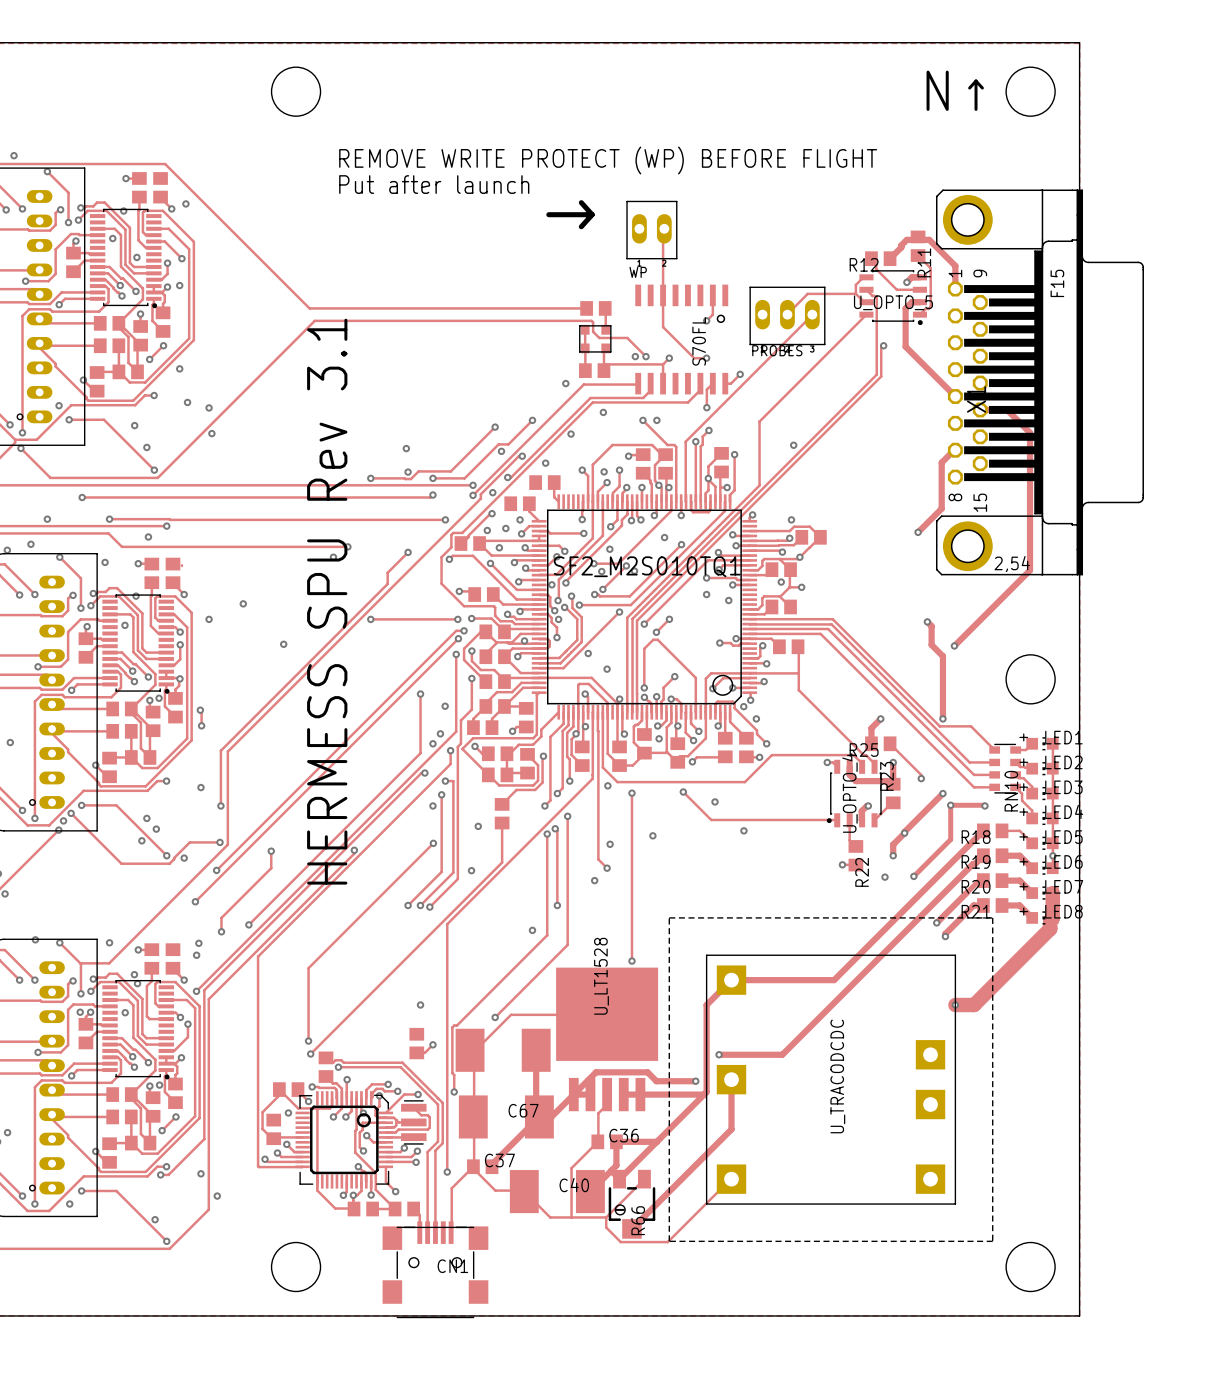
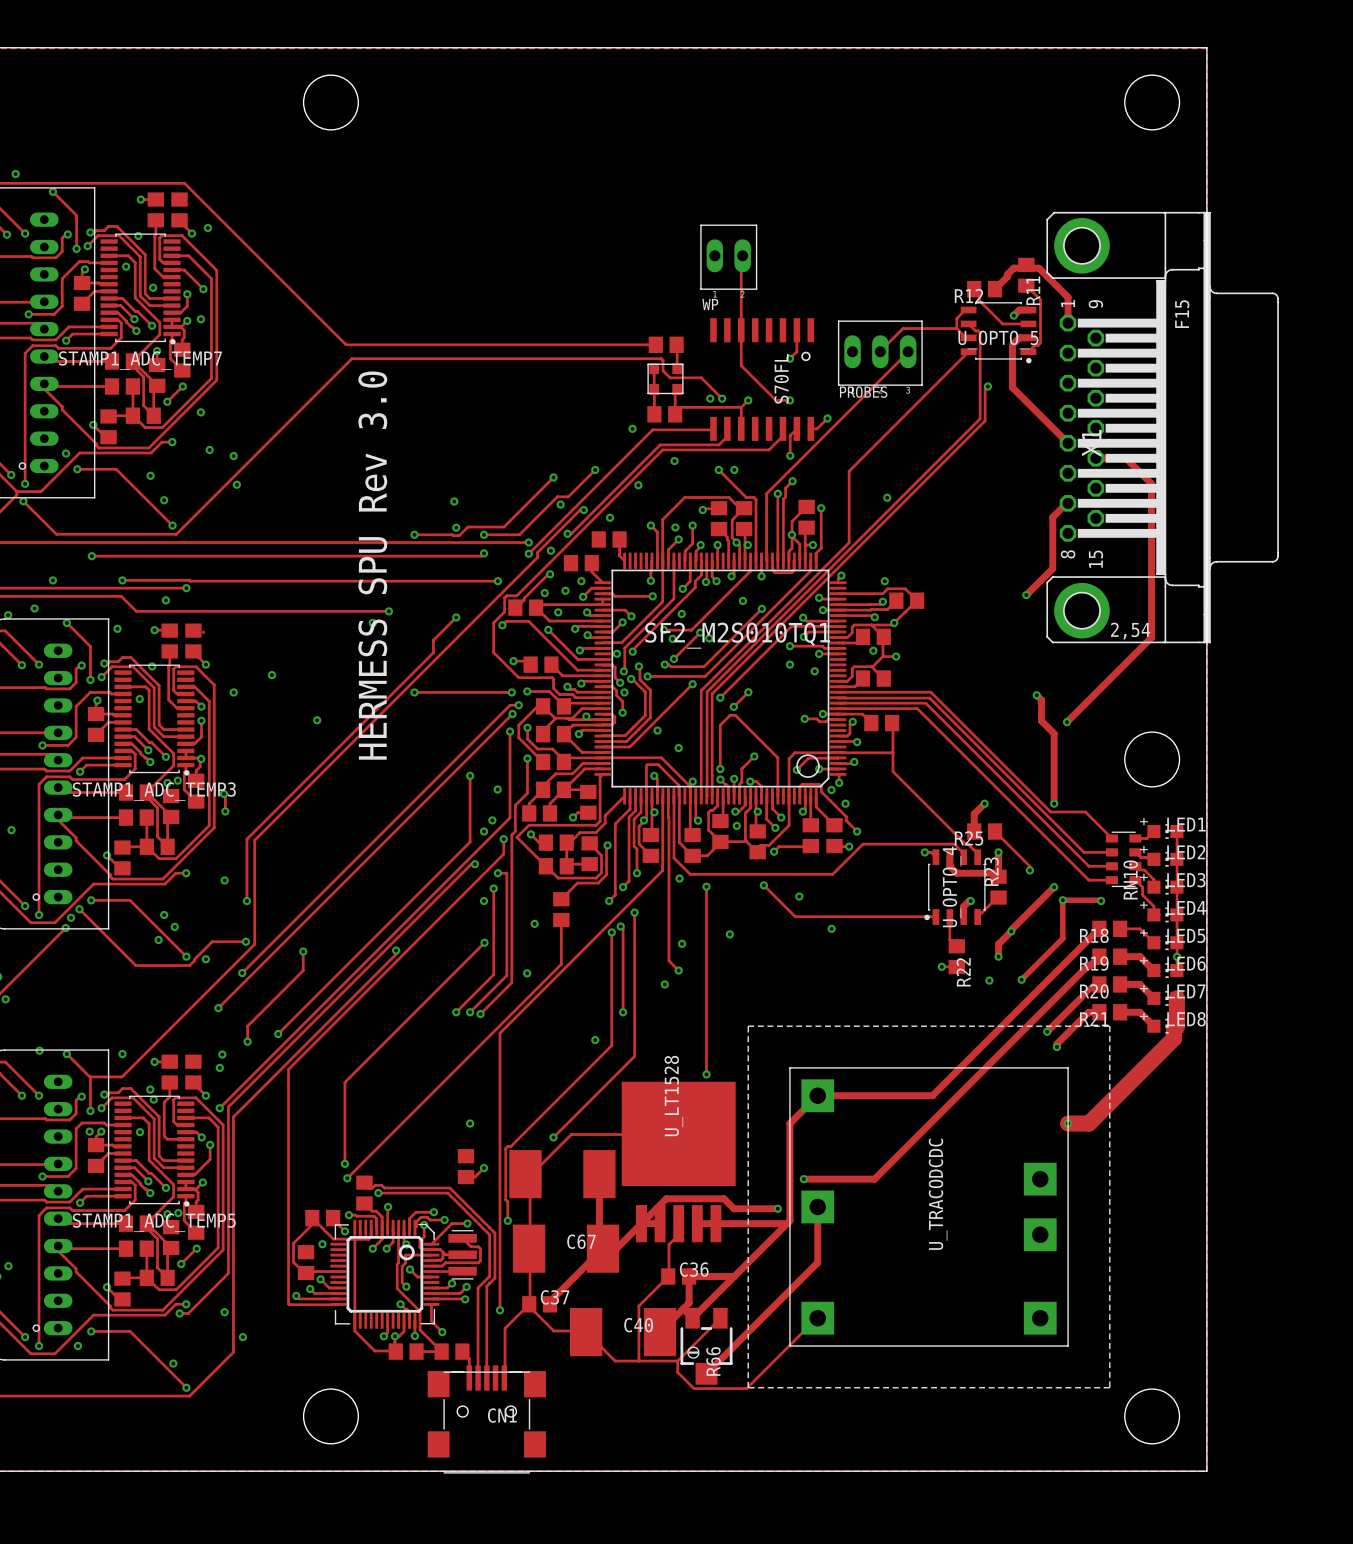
text: N↑ (955, 90) -> none
text: REMOVE WRITE PROTECT (WP) BEFORE FLIGHT (608, 160) -> none
text: Put after launch (434, 184) -> none
text: → (570, 214) -> none
STAMP1_ADC_TEMP7 name: none -> STAMP1_ADC_TEMP7 (140, 360)
text: HERMESS SPU Rev 3.1 (327, 601) -> HERMESS SPU Rev 3.0 (372, 565)
STAMP1_ADC_TEMP3 name: none -> STAMP1_ADC_TEMP3 (154, 791)
STAMP1_ADC_TEMP5 name: none -> STAMP1_ADC_TEMP5 (154, 1222)

